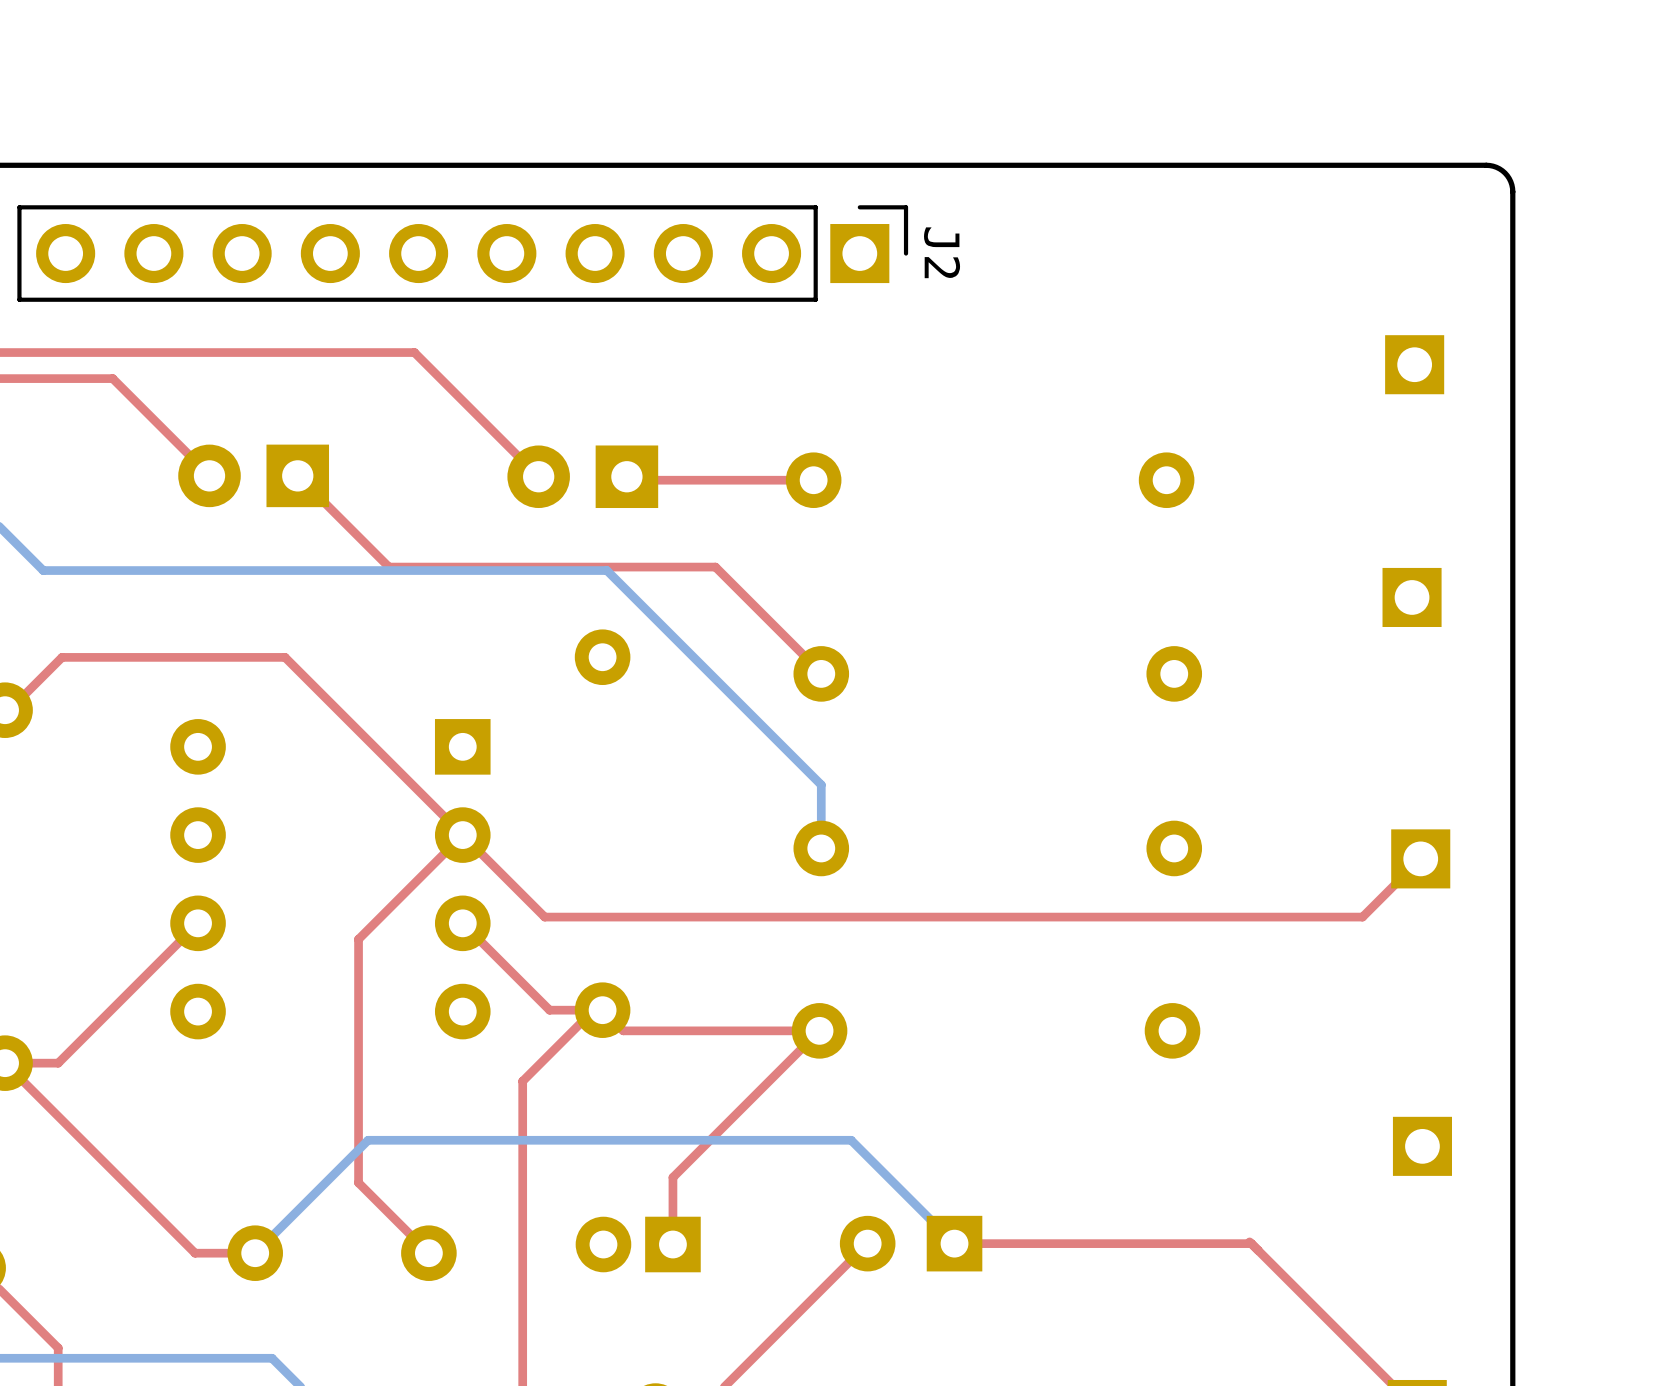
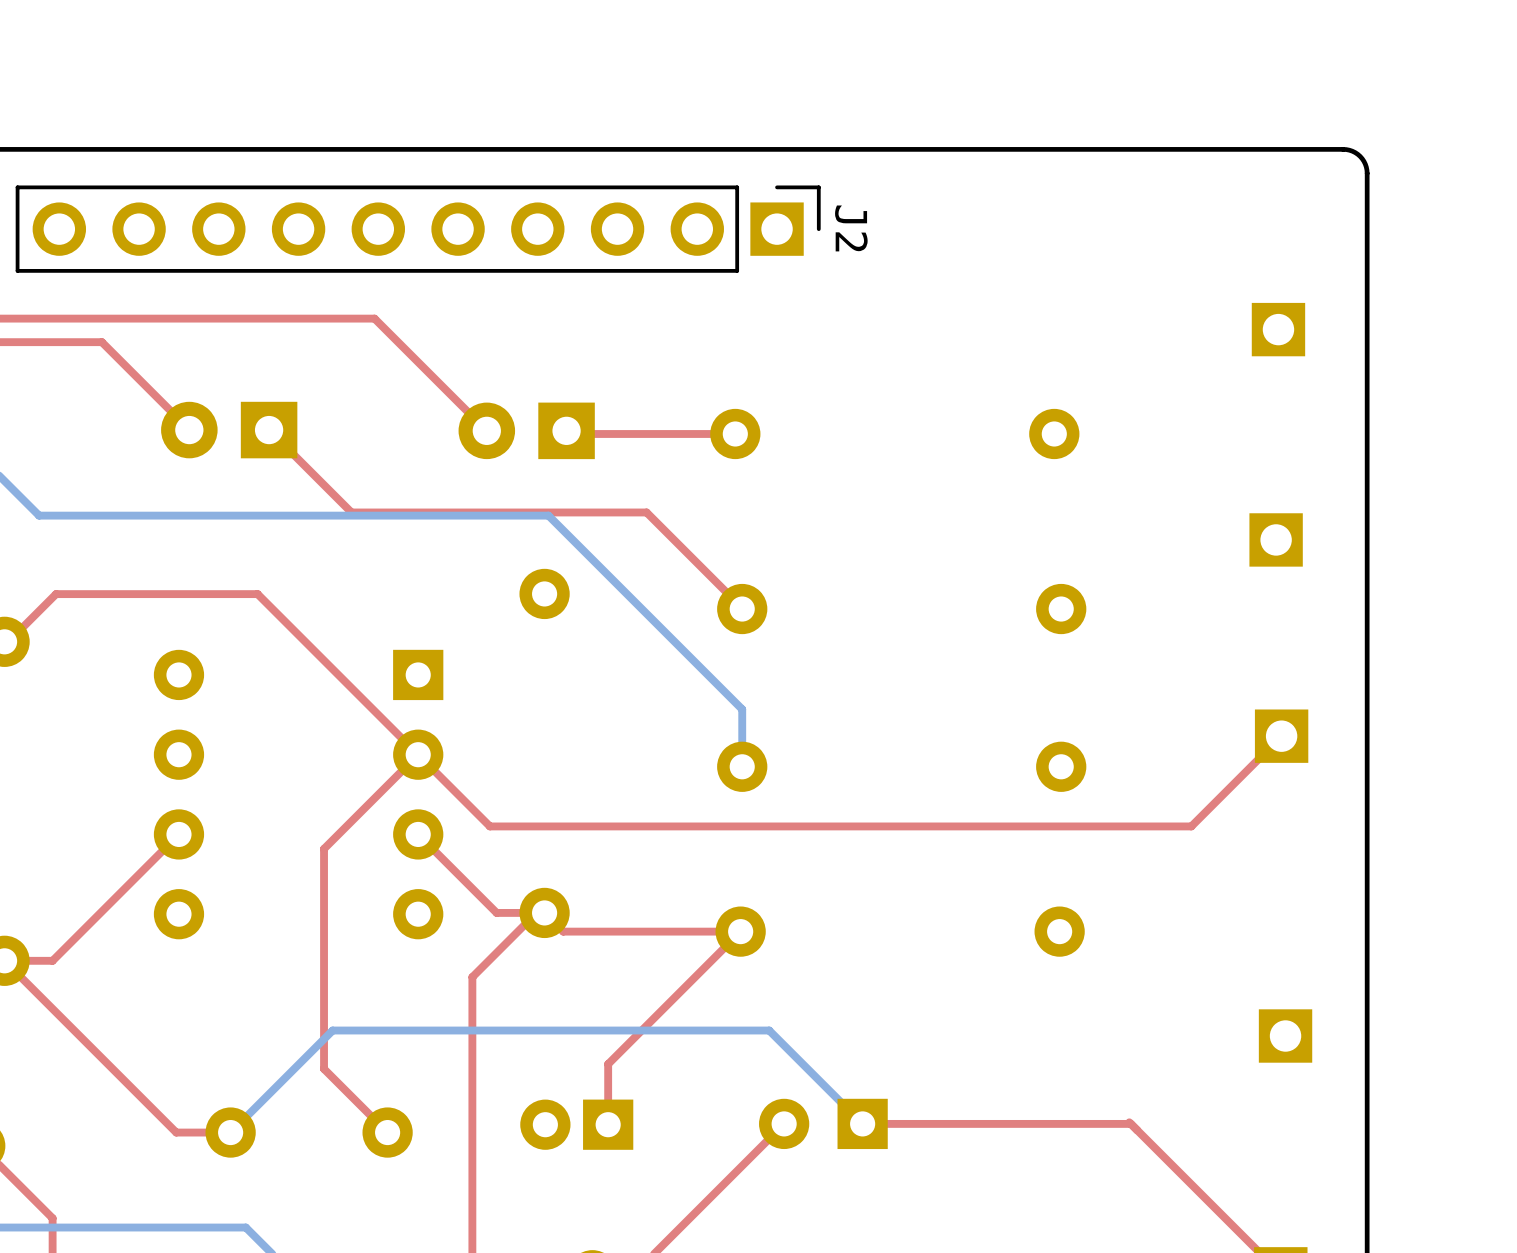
top track: (1420, 858) (1362, 917) (544, 917) (542, 914) -> (1281, 736) (1191, 826) (489, 826)
part position: (1420, 858) -> (1281, 736)

